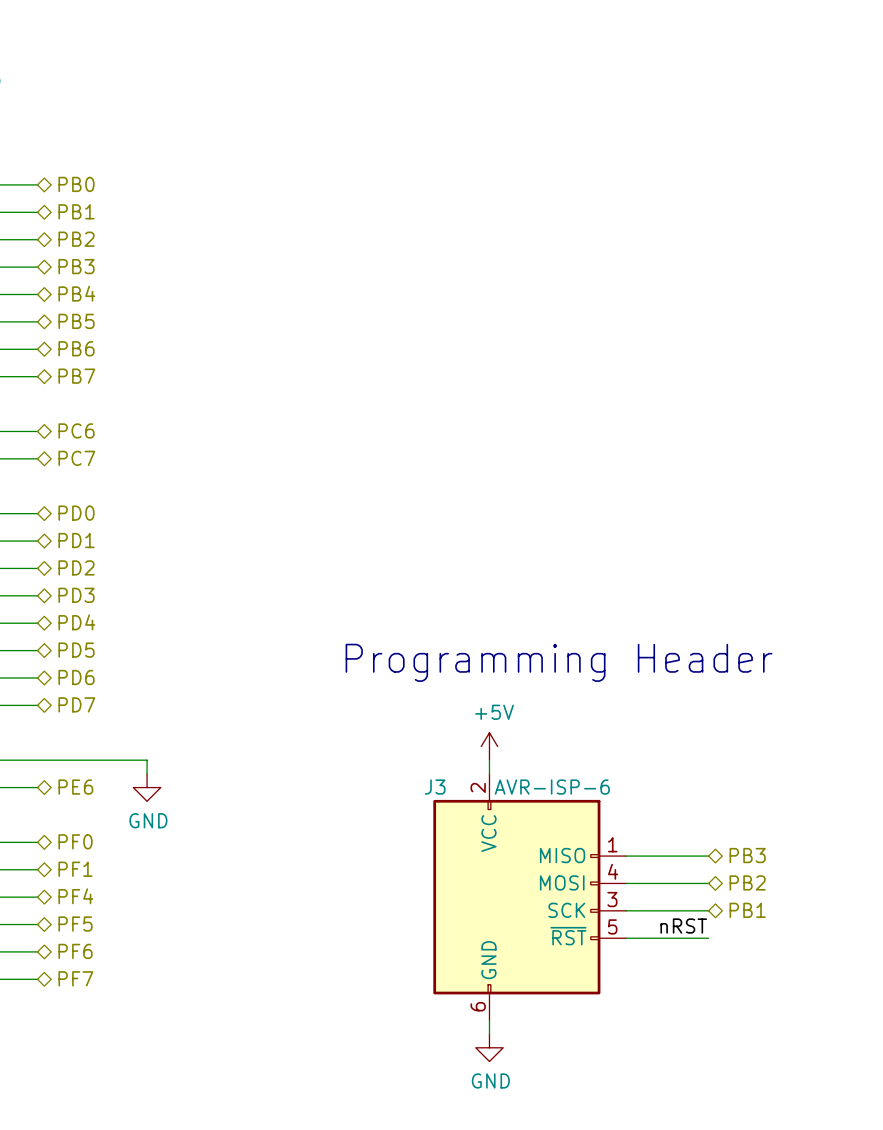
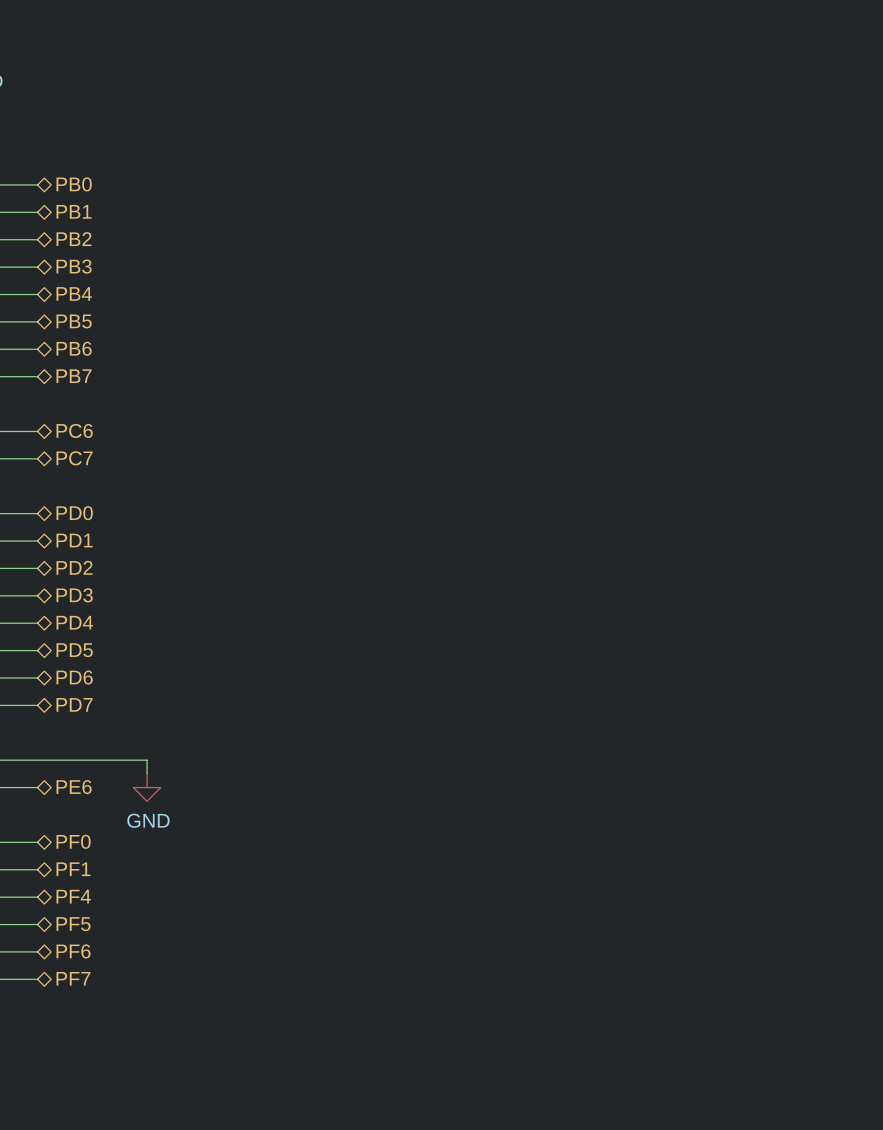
text: Programming Header (559, 662) -> none
power symbol: +5V (489, 746) -> none
wire: (489, 760) (489, 773) -> none
hierarchical label: PB3 (747, 855) -> none
wire: (626, 856) (708, 856) -> none
hierarchical label: PB2 (747, 882) -> none
wire: (626, 883) (708, 883) -> none
J3: AVR-ISP-6 (529, 897) -> none
wire: (626, 910) (708, 910) -> none
hierarchical label: PB1 (747, 910) -> none
label: nRST (683, 926) -> none
wire: (626, 938) (708, 938) -> none
wire: (489, 1020) (489, 1034) -> none
power symbol: GND (489, 1047) -> none

